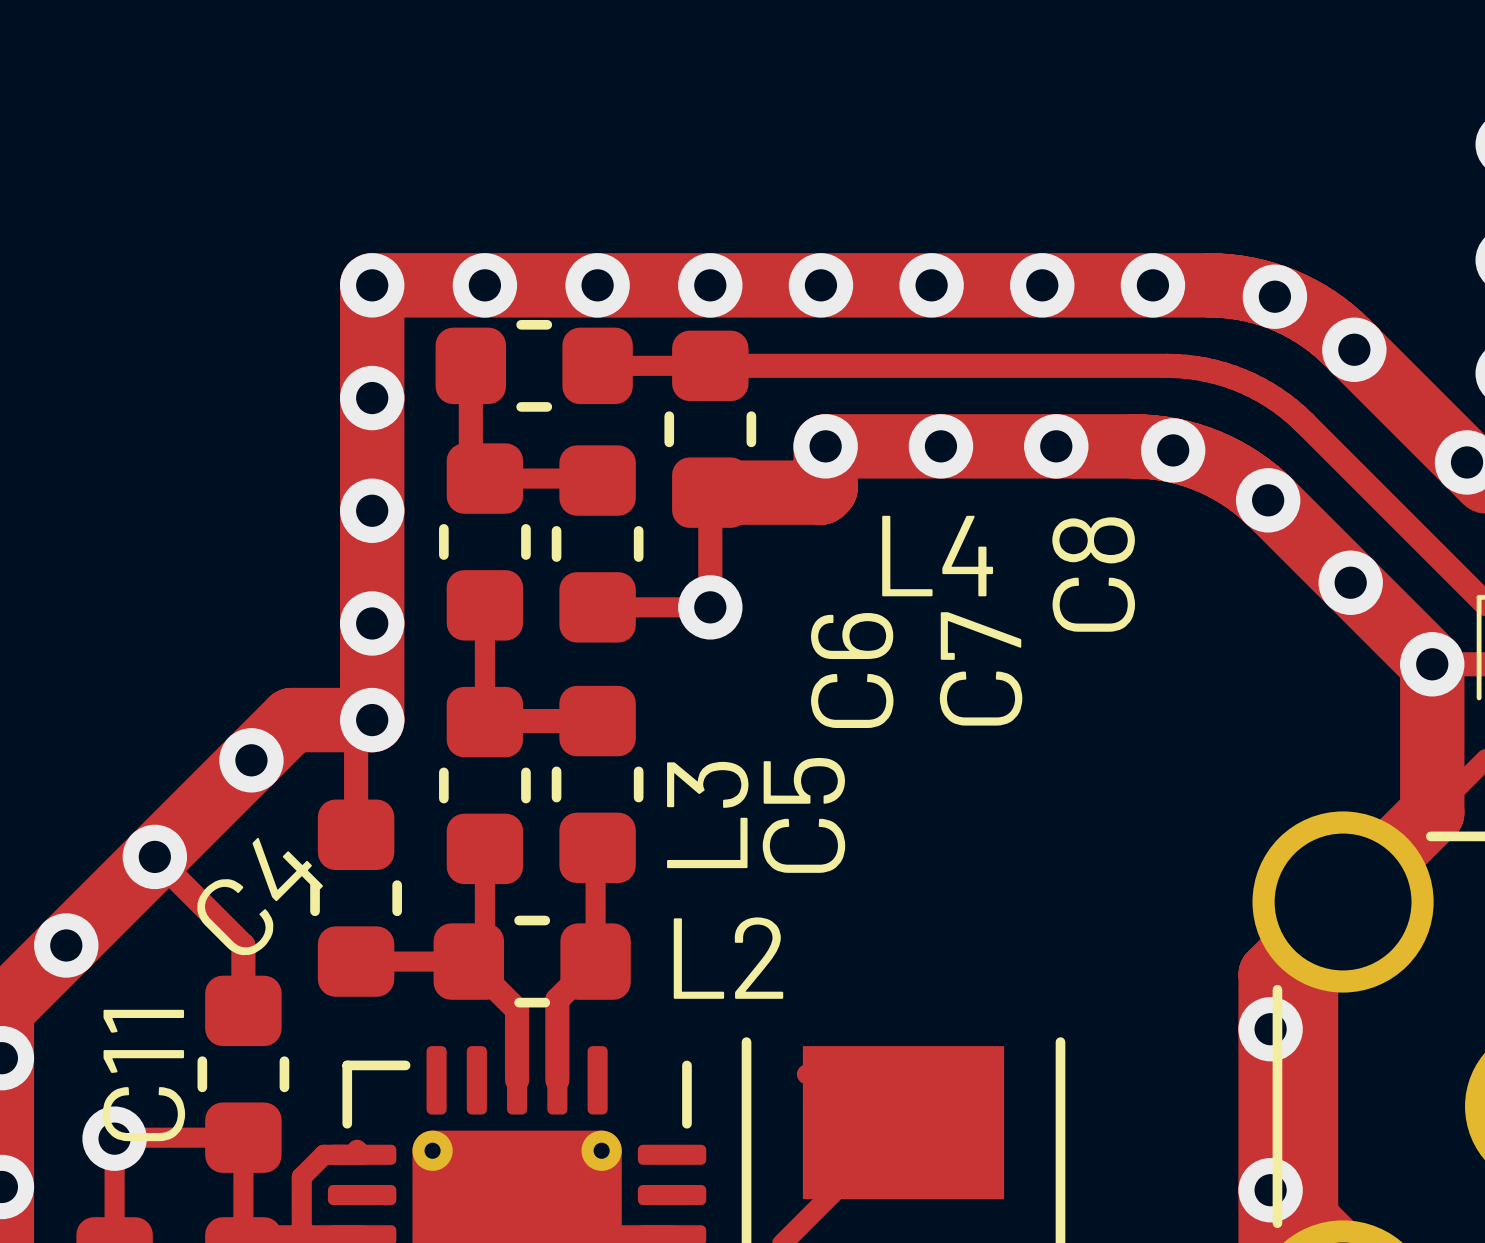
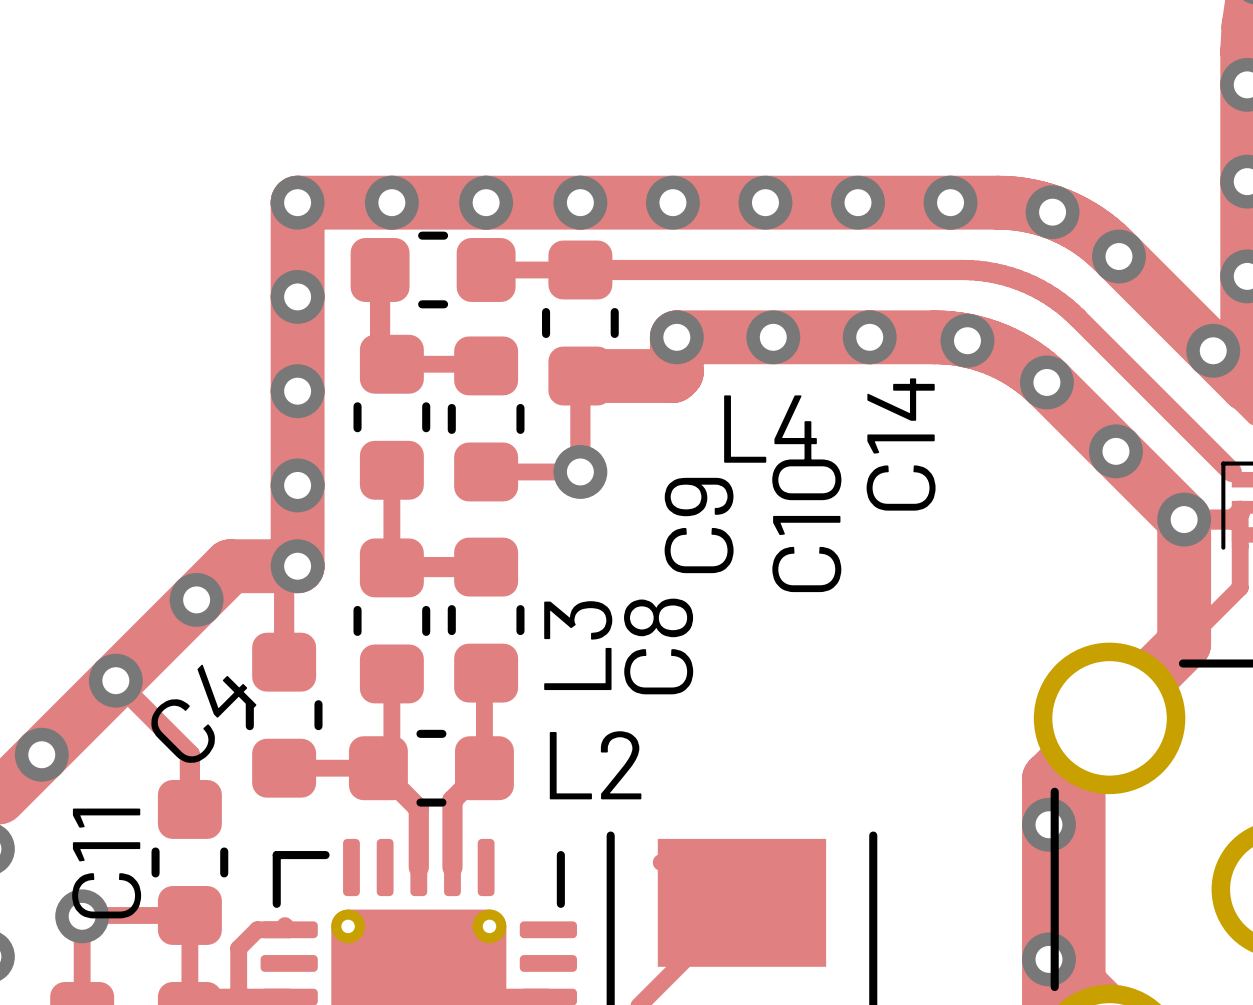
C8 name: C8 (1093, 574) -> C14 (901, 444)
C7 name: C7 (981, 668) -> C10 (806, 525)
C6 name: C6 (852, 670) -> C9 (699, 525)
C5 name: C5 (803, 815) -> C8 (658, 646)

